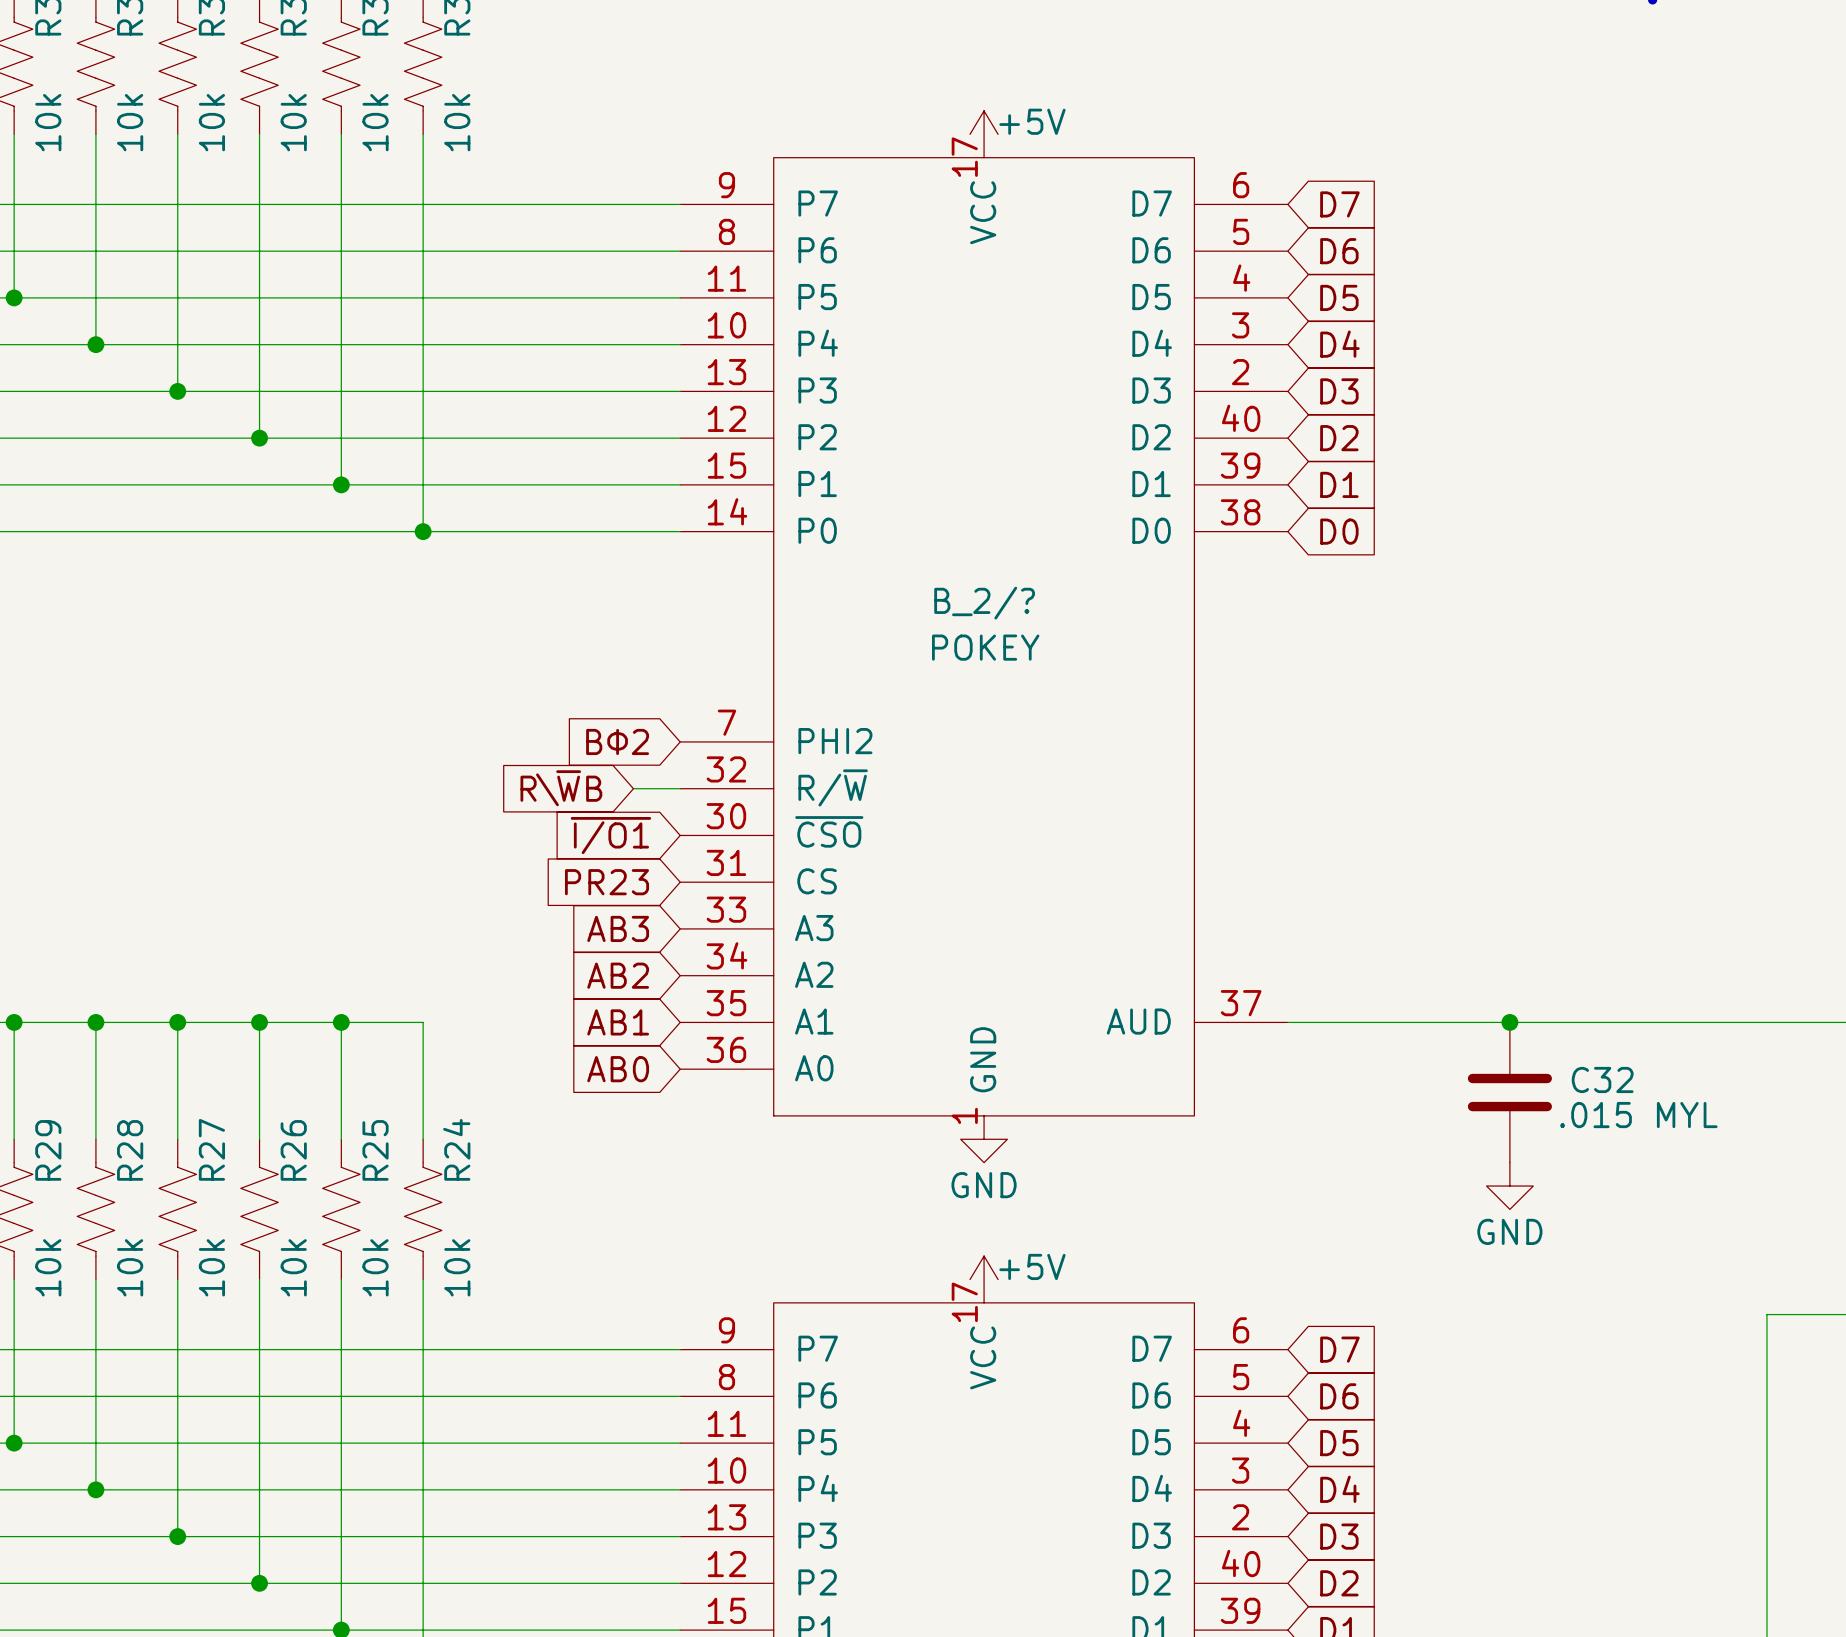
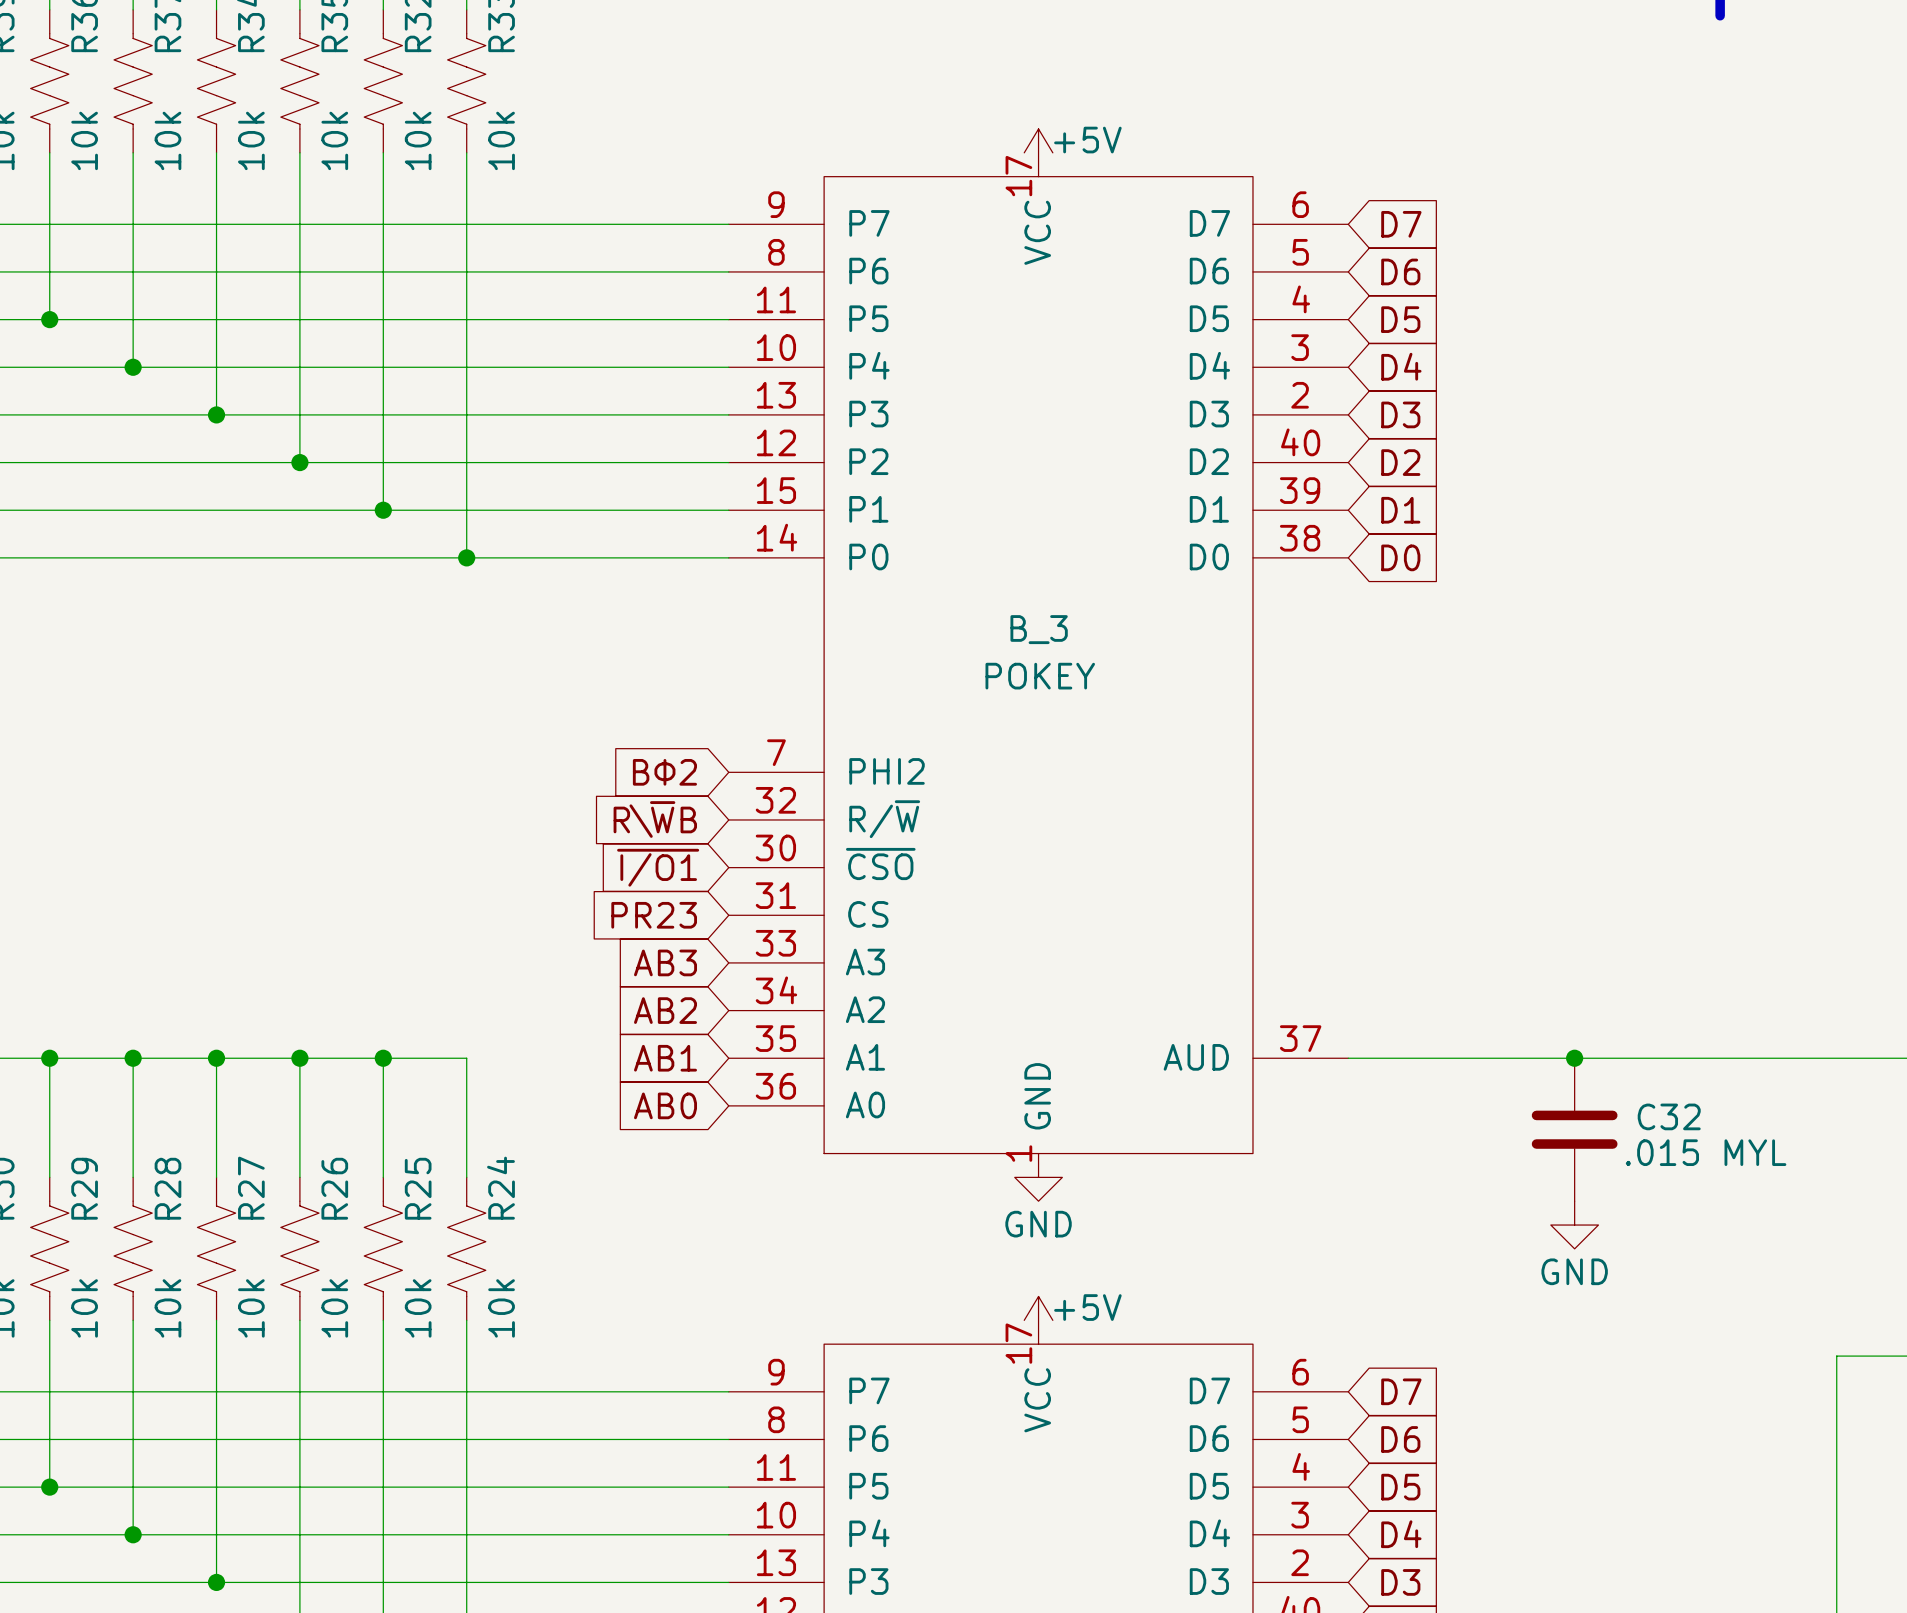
B_2/? name: B_2/? (984, 603) -> B_3 (1039, 629)
global label position: R\~{W}B (561, 788) -> R\~{W}B (655, 819)
wire: (633, 788) (680, 788) -> none

